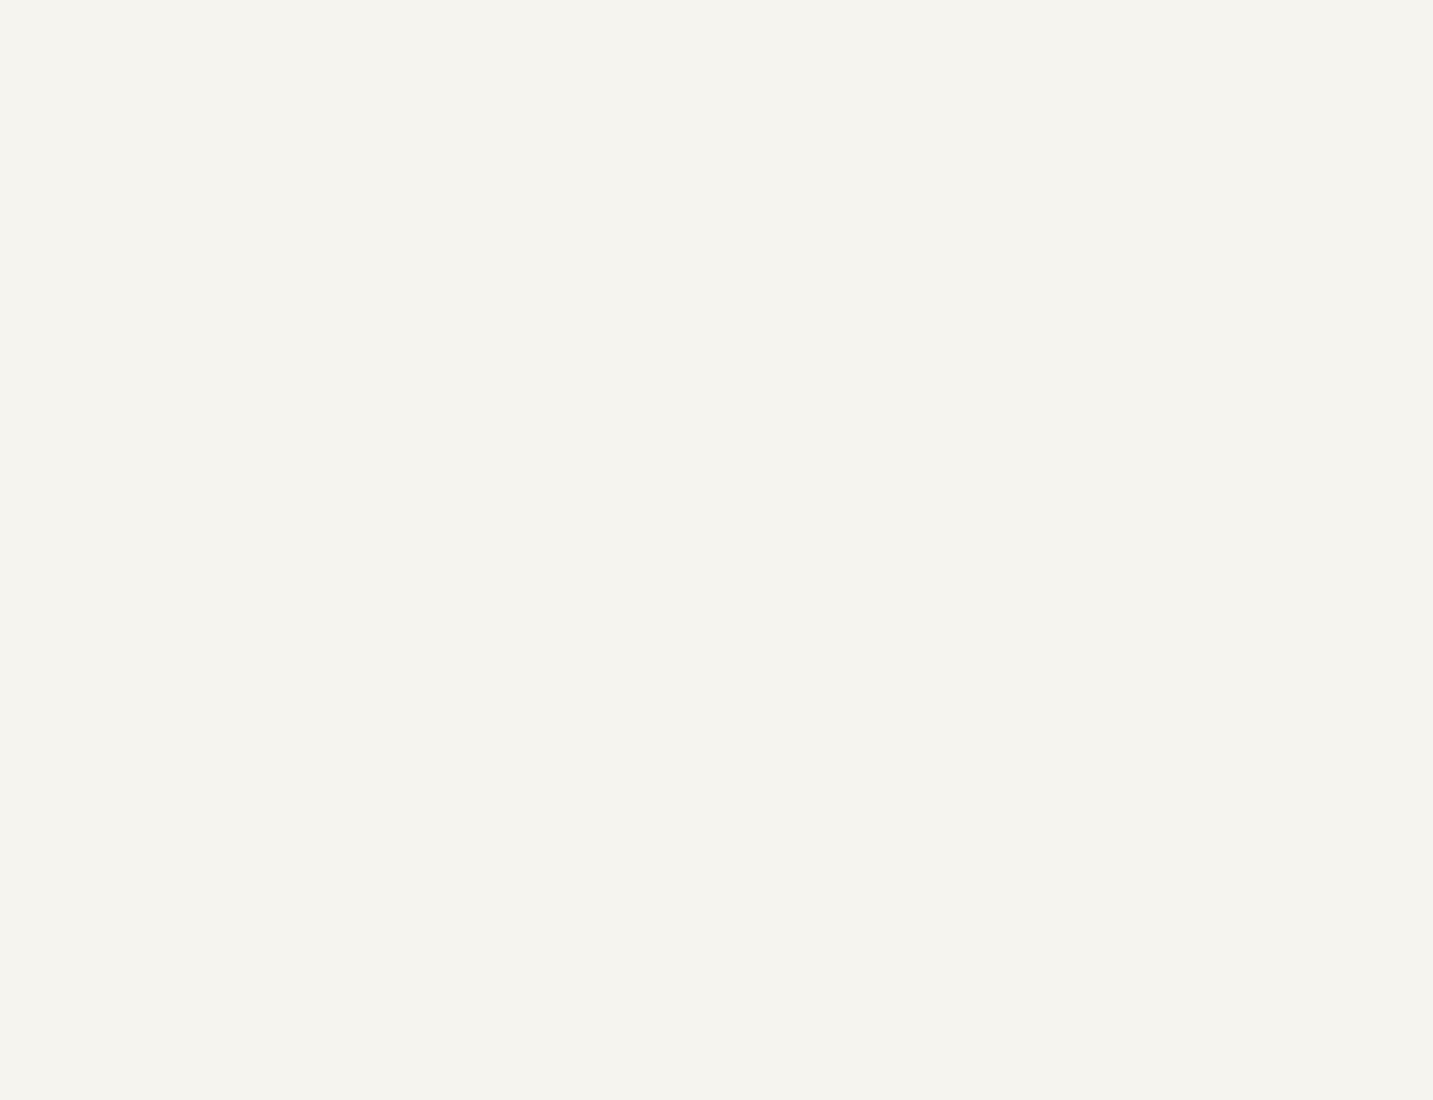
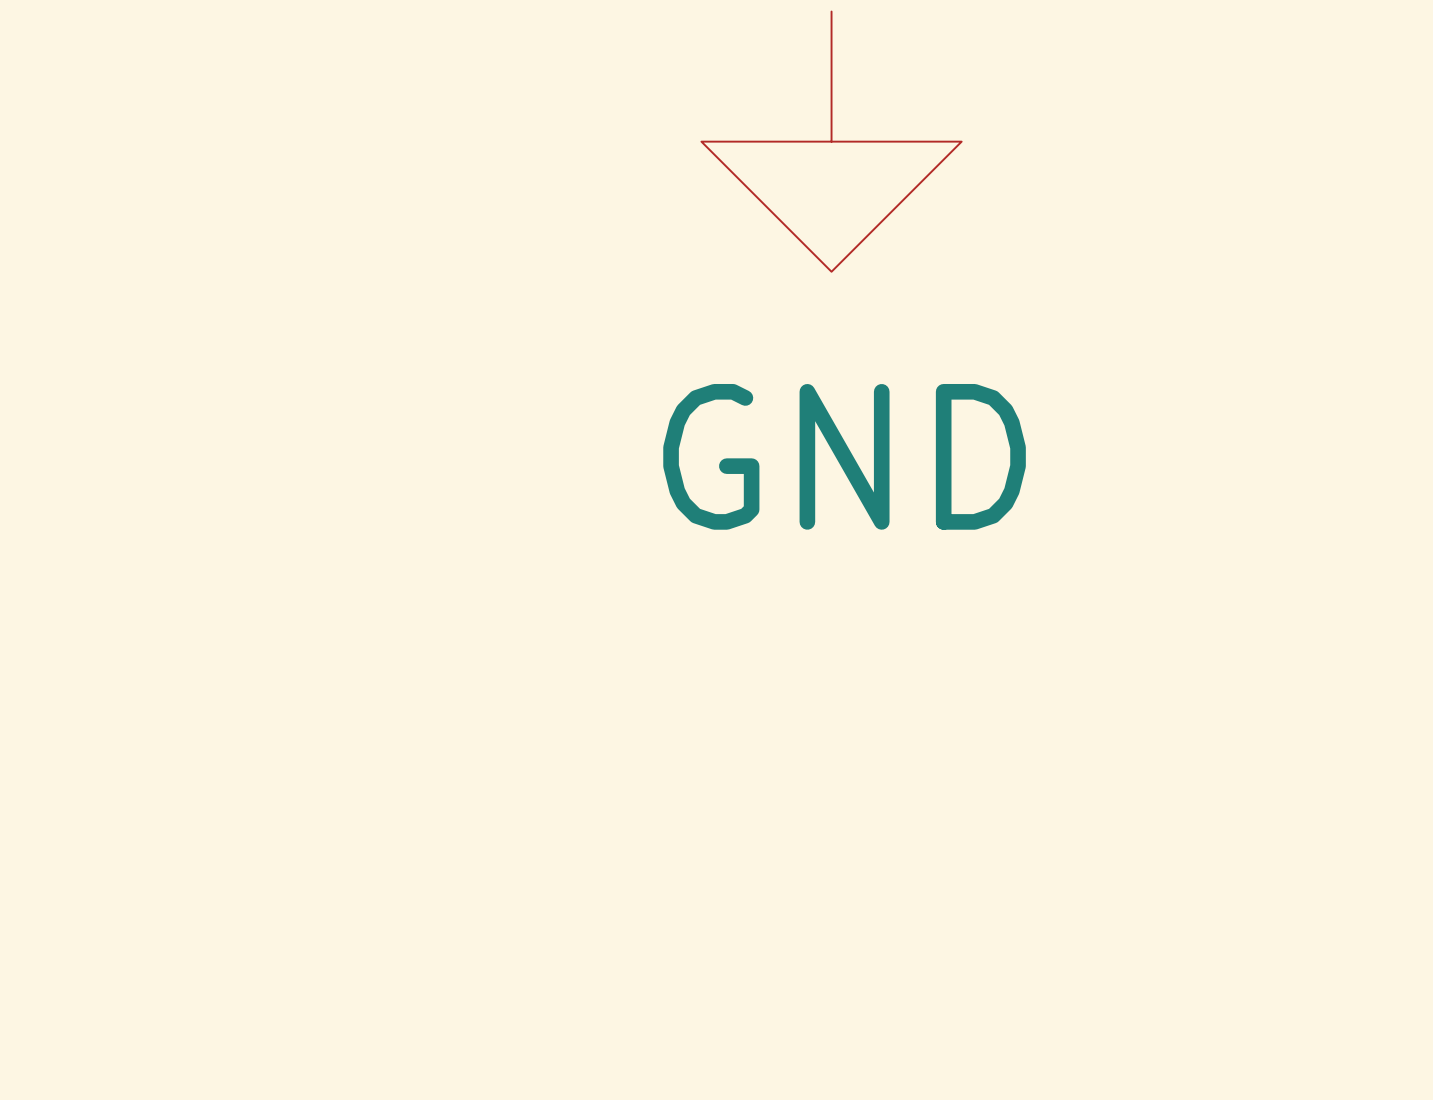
power symbol: none -> GND (831, 141)

